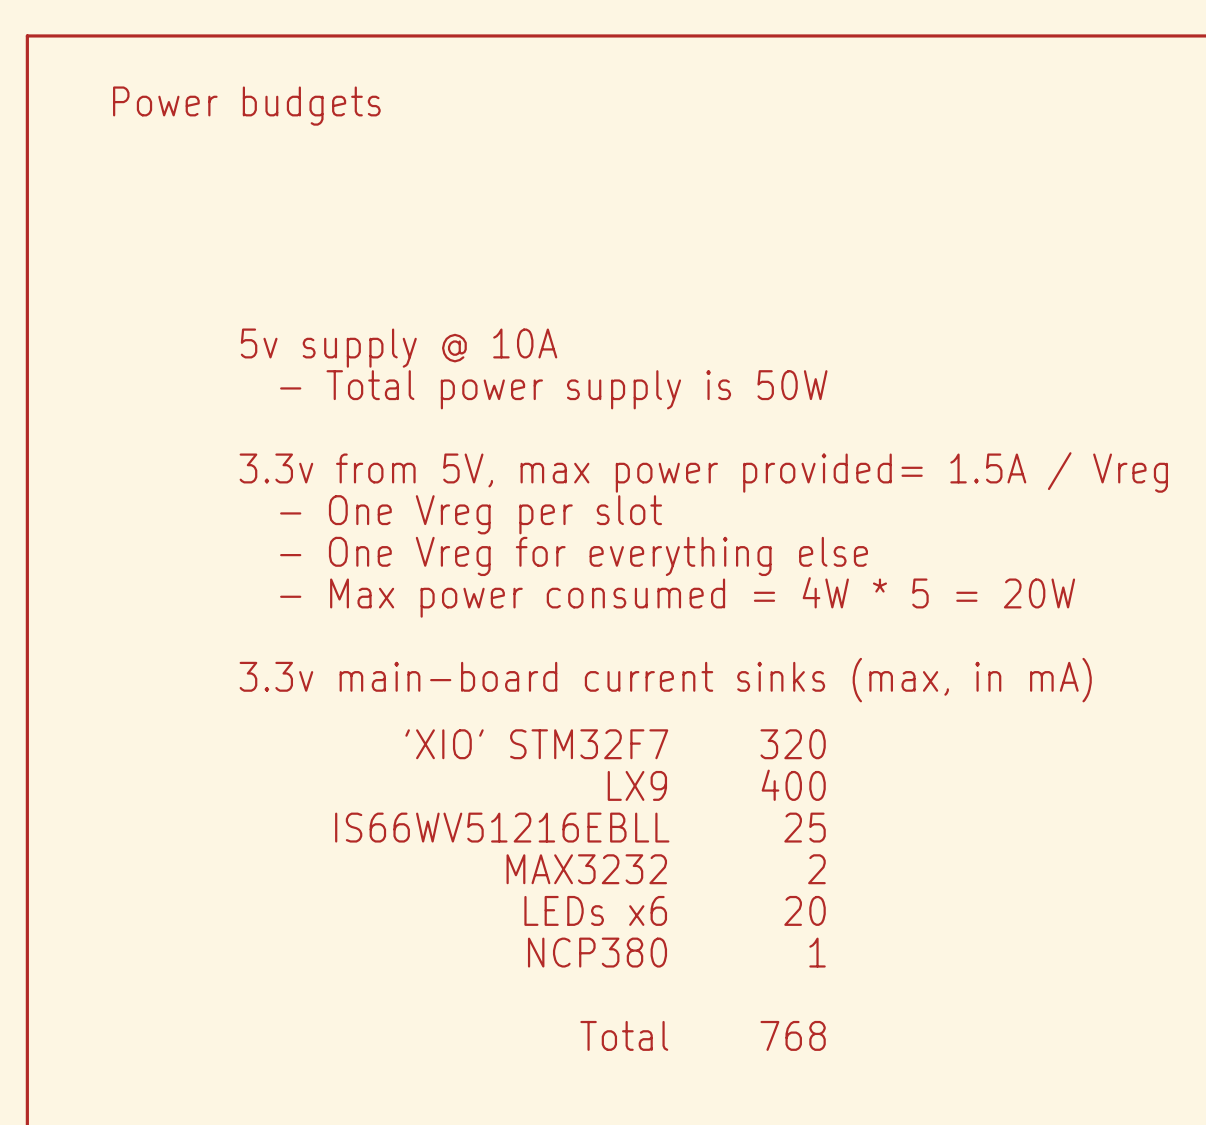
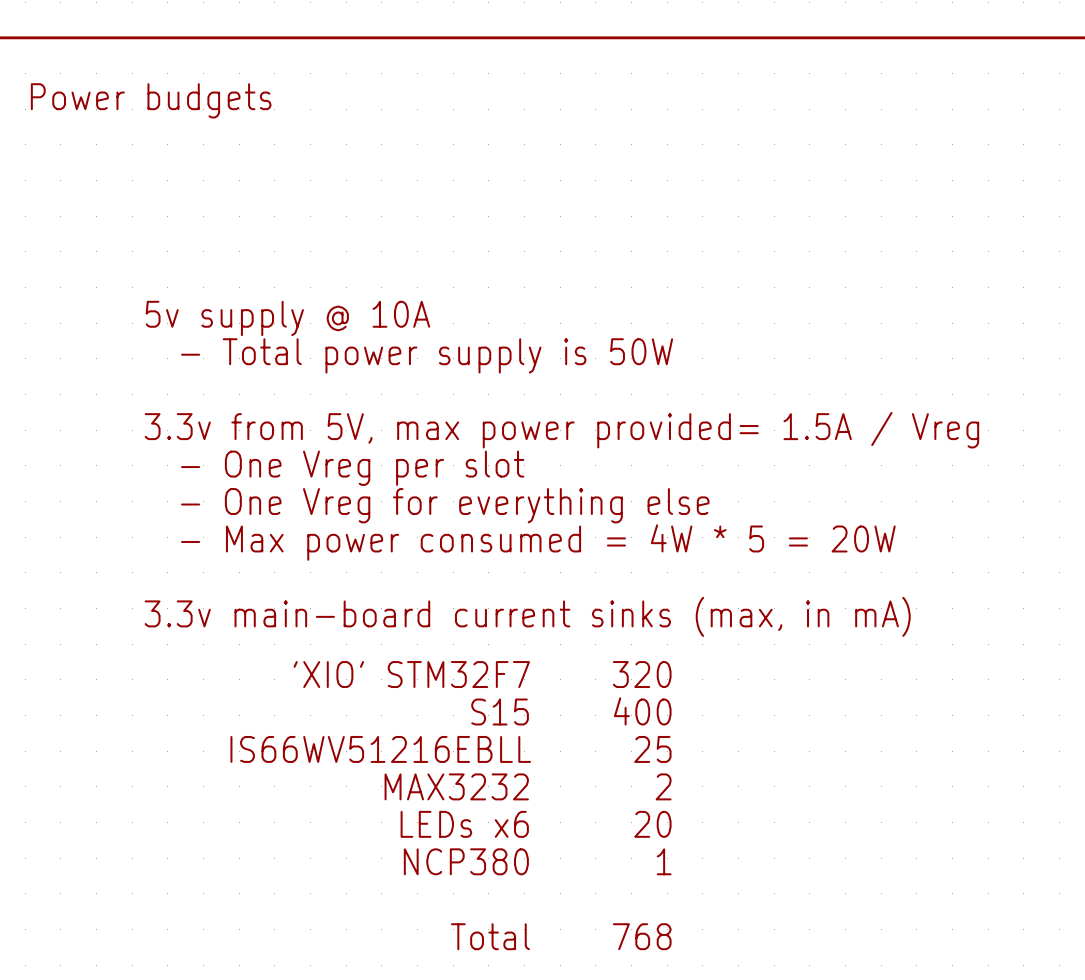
text: LX9 (637, 785) -> S15 (500, 711)

